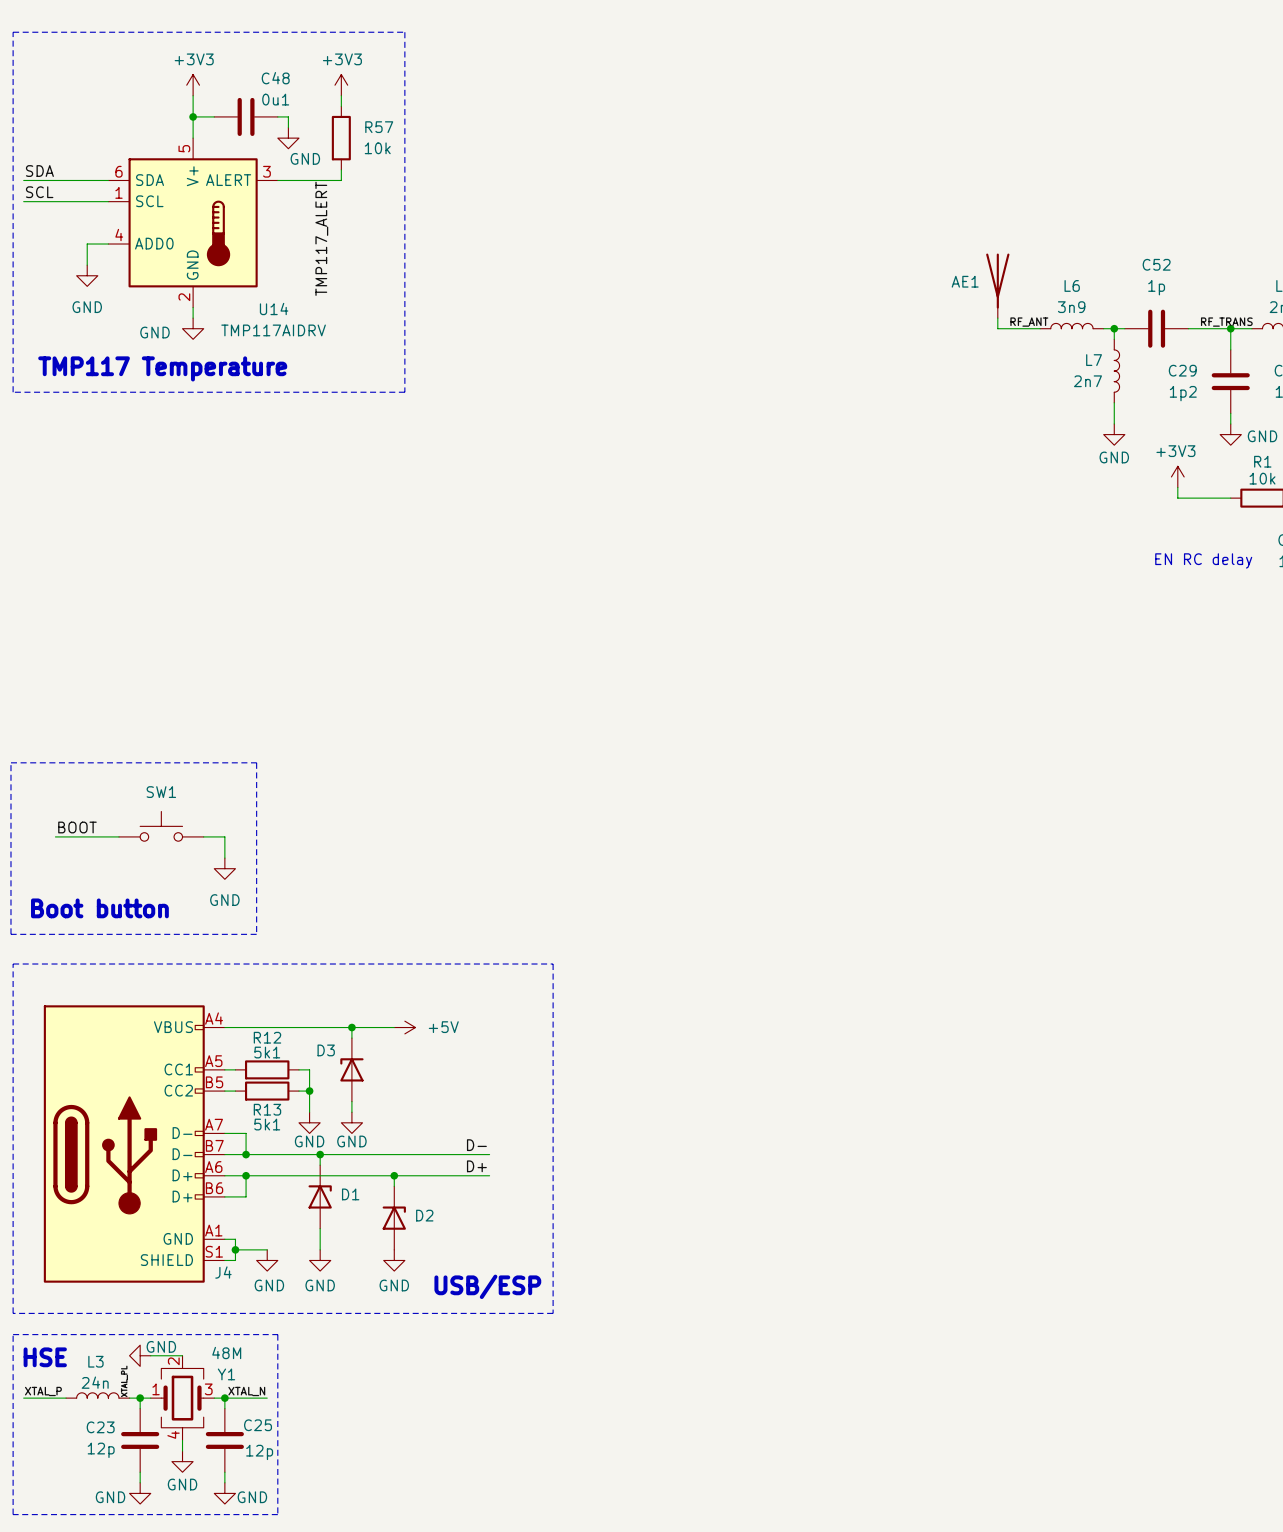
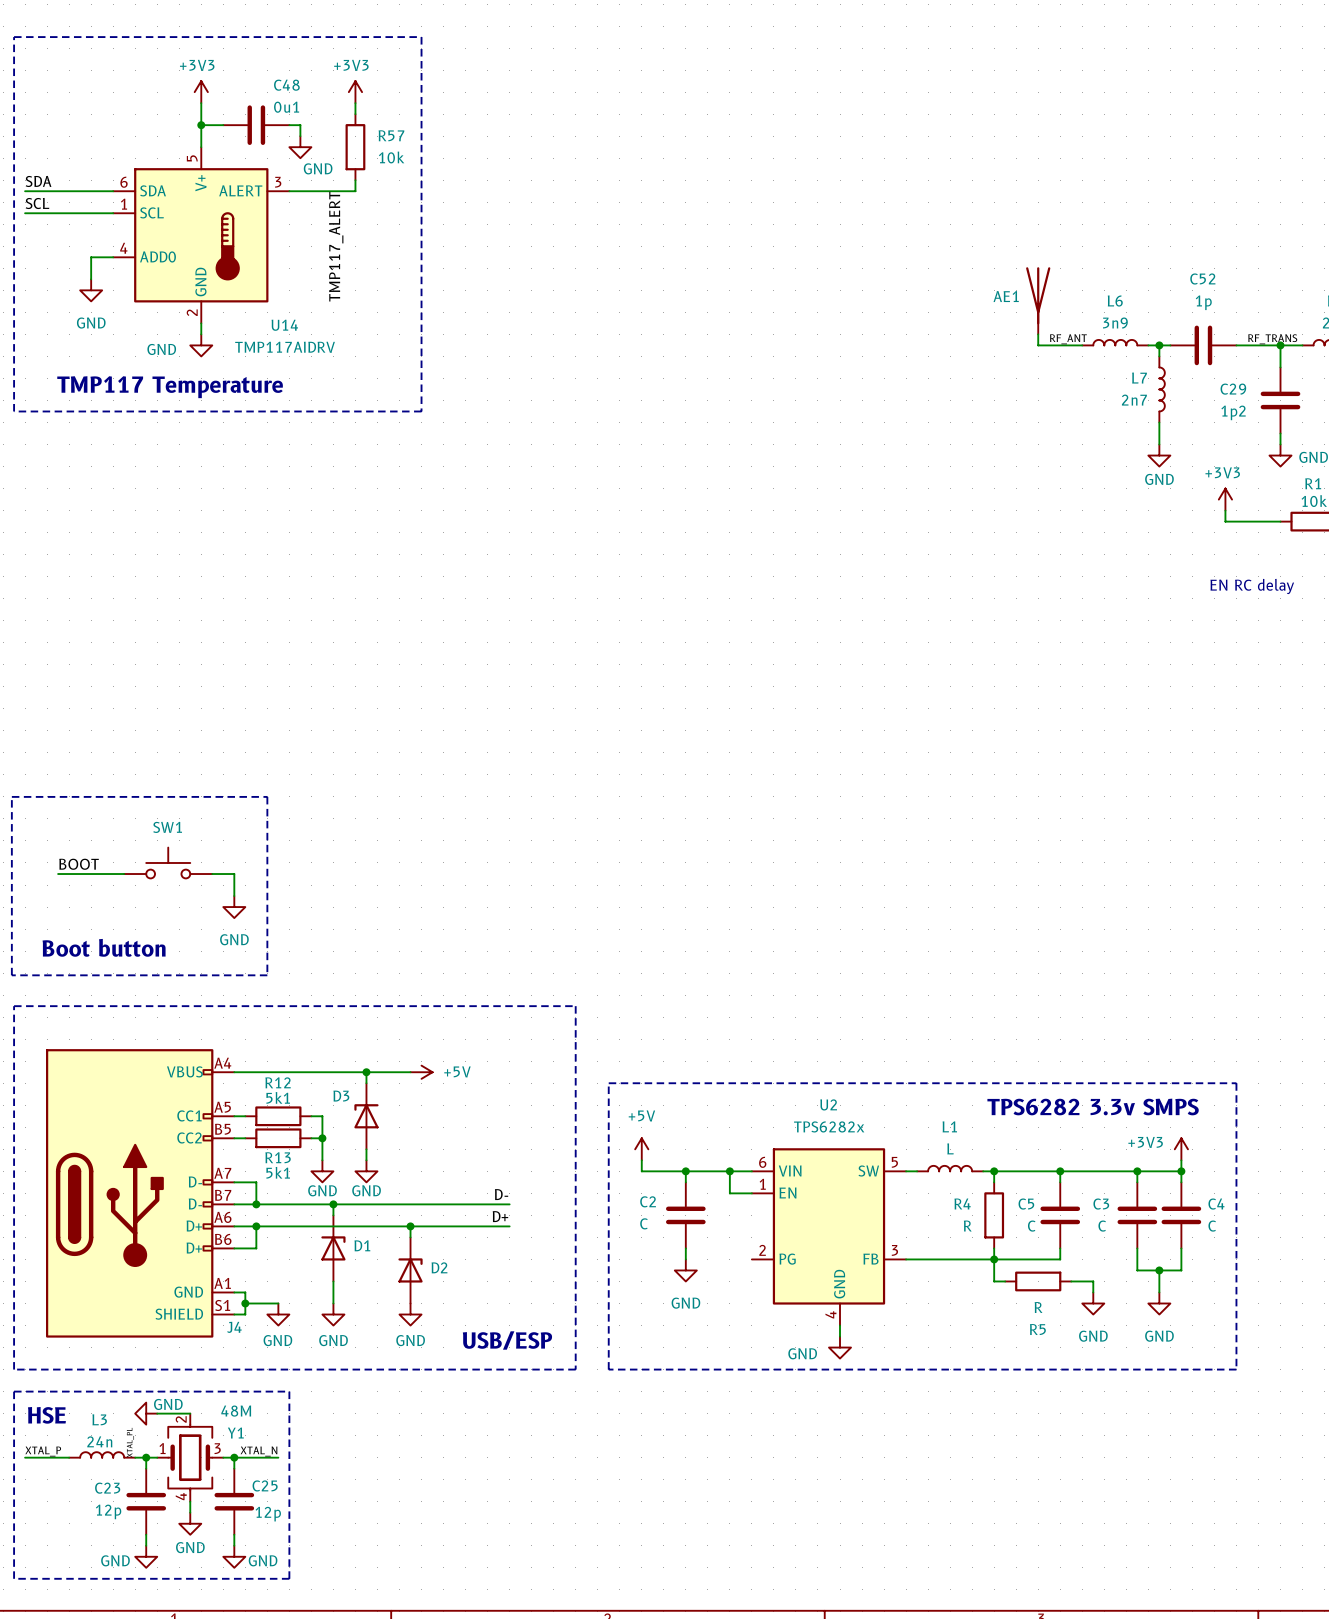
line: none -> (608, 1083) (1236, 1083) (1236, 1369) (608, 1369) (608, 1083)
text: none -> TPS6282 3.3v SMPS (1093, 1107)
power symbol: none -> +5V (641, 1149)
power symbol: none -> +3V3 (1181, 1149)
wire: none -> (641, 1160) (641, 1171) (751, 1171)
wire: none -> (1181, 1160) (1181, 1182)
L1: none -> L (950, 1168)
wire: none -> (685, 1171) (685, 1182)
junction: none -> (685, 1171)
wire: none -> (729, 1171) (729, 1193) (751, 1193)
junction: none -> (729, 1171)
wire: none -> (906, 1171) (917, 1171)
wire: none -> (983, 1171) (1181, 1171)
wire: none -> (994, 1171) (994, 1182)
junction: none -> (994, 1171)
wire: none -> (1060, 1171) (1060, 1182)
junction: none -> (1060, 1171)
wire: none -> (1137, 1171) (1137, 1182)
junction: none -> (1137, 1171)
junction: none -> (1181, 1171)
C2: none -> C (685, 1215)
R4: none -> R (994, 1215)
C5: none -> C (1060, 1215)
C3: none -> C (1137, 1215)
C4: none -> C (1181, 1215)
U2: none -> TPS6282x (828, 1236)
wire: none -> (685, 1248) (685, 1259)
wire: none -> (994, 1248) (994, 1281) (1005, 1281)
wire: none -> (1060, 1248) (1060, 1259) (906, 1259)
wire: none -> (1137, 1248) (1137, 1270) (1181, 1270) (1181, 1248)
junction: none -> (994, 1259)
power symbol: none -> GND (685, 1270)
wire: none -> (1159, 1270) (1159, 1292)
junction: none -> (1159, 1270)
R5: none -> R (1038, 1281)
wire: none -> (1071, 1281) (1093, 1281) (1093, 1292)
power symbol: none -> GND (1093, 1303)
power symbol: none -> GND (1159, 1303)
wire: none -> (840, 1325) (840, 1336)
power symbol: none -> GND (840, 1347)

